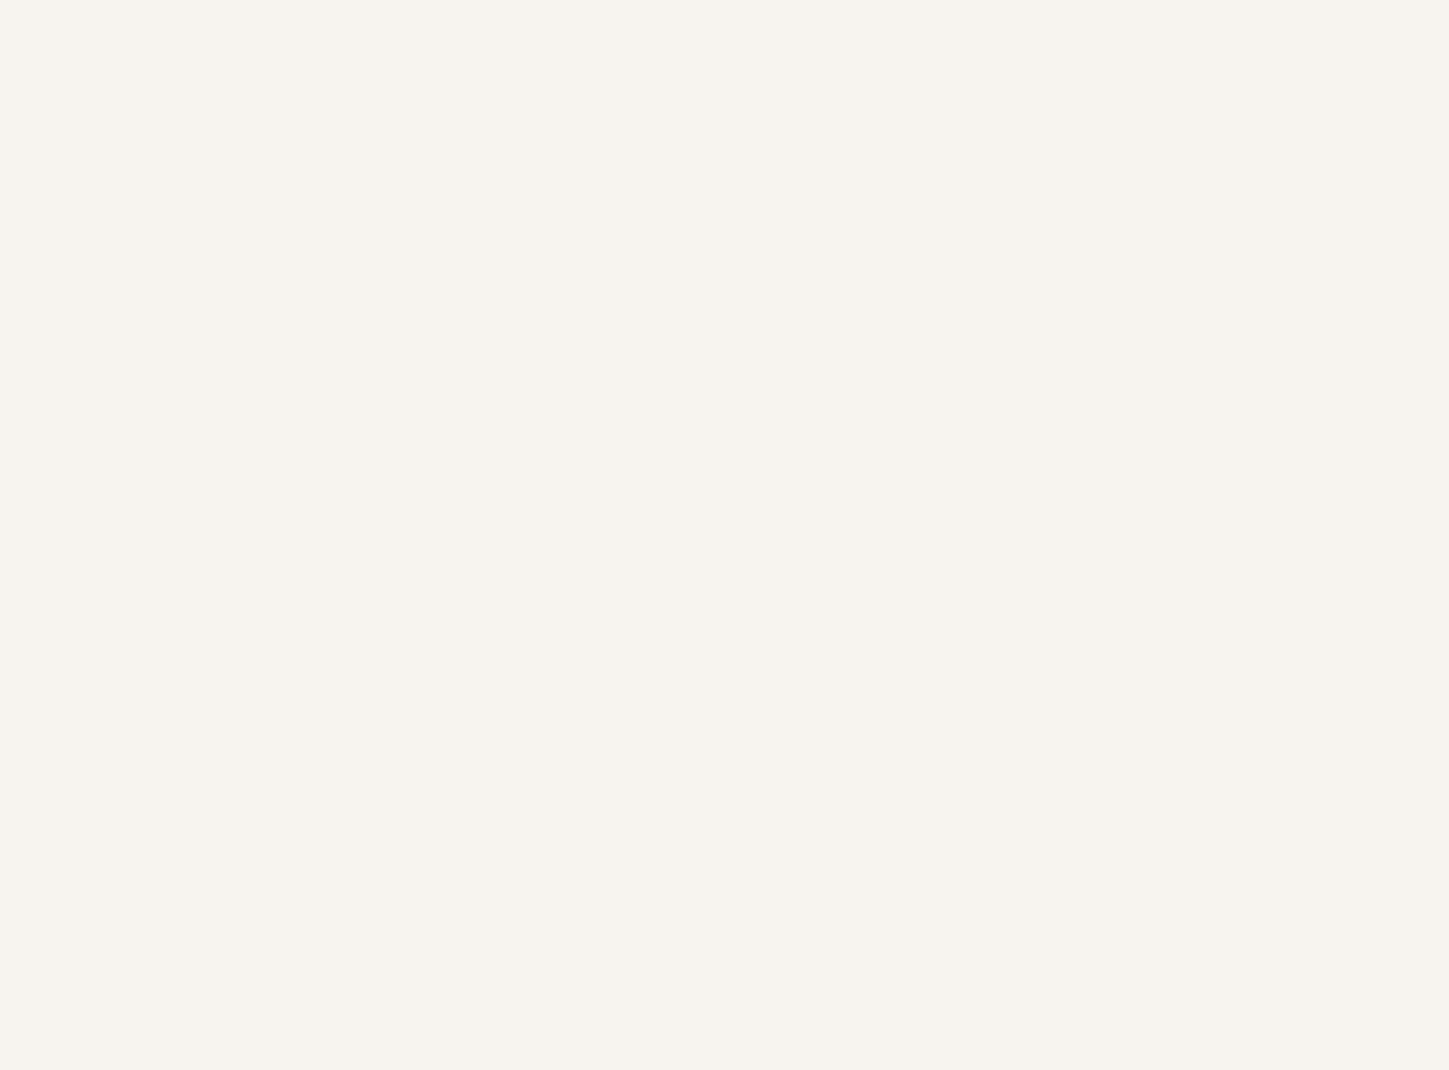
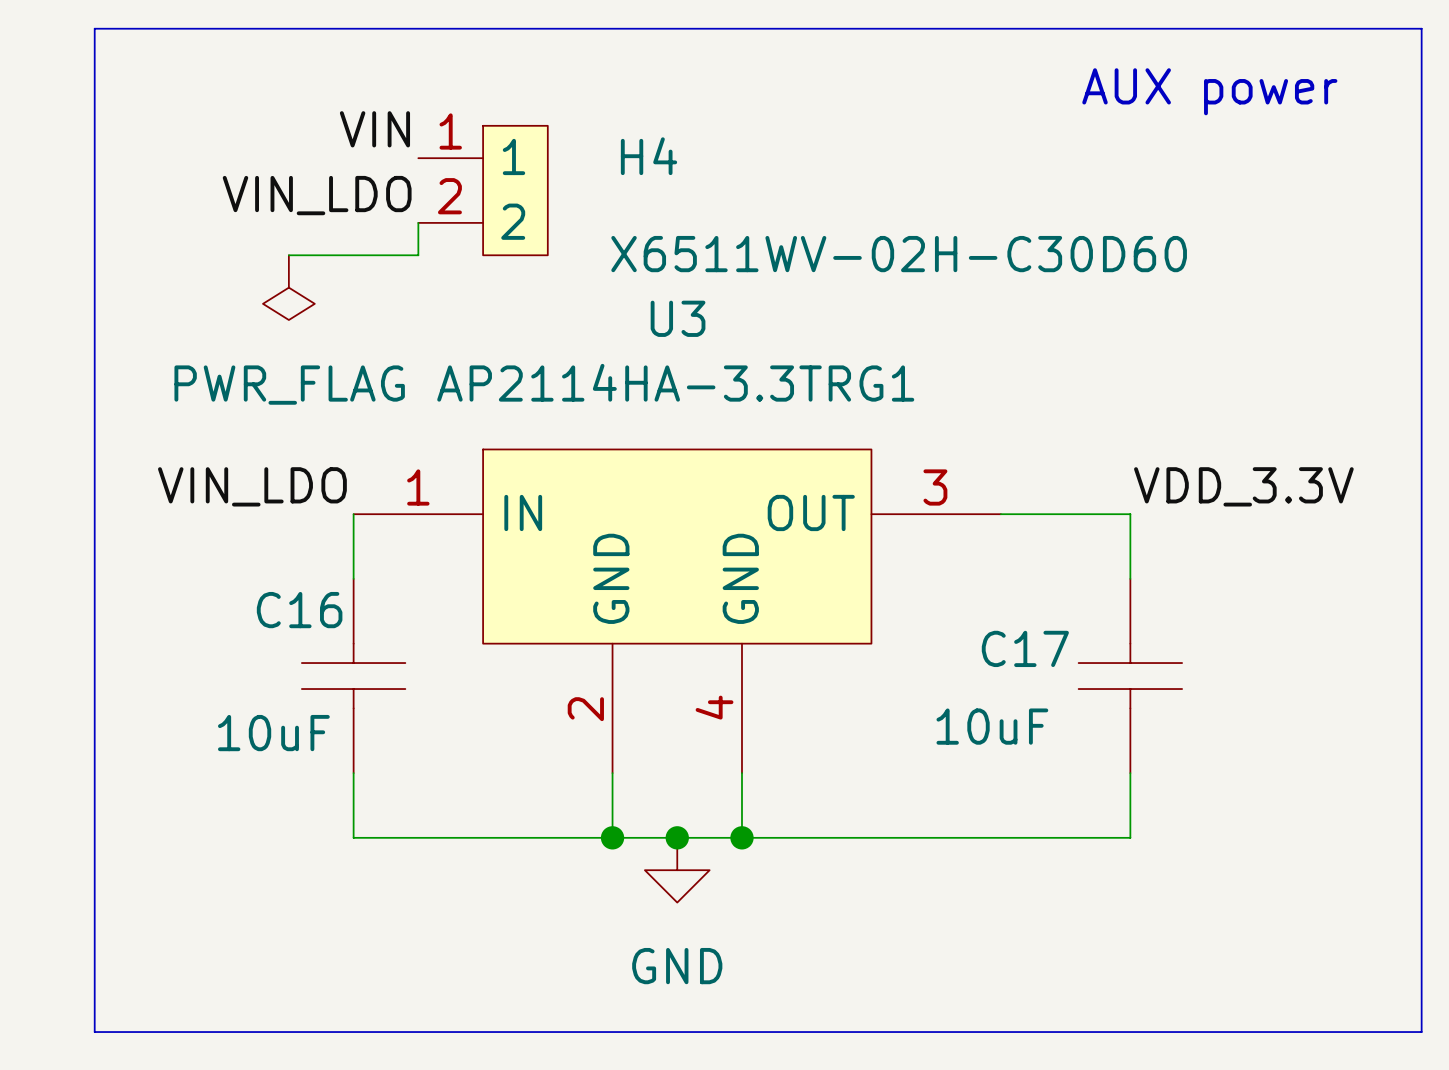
line: none -> (94, 28) (1421, 28) (1421, 1032) (94, 1032) (94, 28)
text: none -> AUX power (1209, 91)
label: none -> VIN (374, 129)
H4: none -> X6511WV-02H-C30D60 (483, 190)
label: none -> VIN_LDO (317, 195)
wire: none -> (418, 222) (418, 255) (288, 255)
power symbol: none -> PWR_FLAG (288, 287)
label: none -> VIN_LDO (252, 486)
label: none -> VDD_3.3V (1243, 486)
wire: none -> (353, 514) (353, 578)
wire: none -> (1000, 514) (1130, 514) (1130, 578)
U3: none -> AP2114HA-3.3TRG1 (677, 611)
C16: none -> (353, 676)
C17: none -> (1130, 676)
wire: none -> (353, 773) (353, 837) (1130, 837) (1130, 773)
wire: none -> (612, 773) (612, 837)
wire: none -> (741, 773) (741, 837)
junction: none -> (612, 837)
junction: none -> (677, 837)
junction: none -> (741, 837)
power symbol: none -> GND (677, 870)

